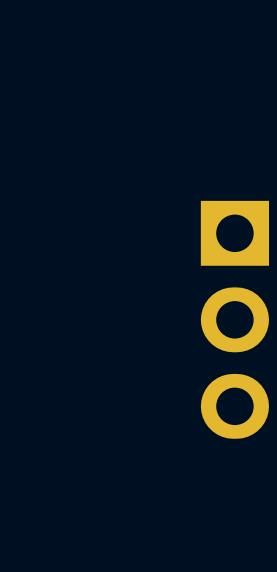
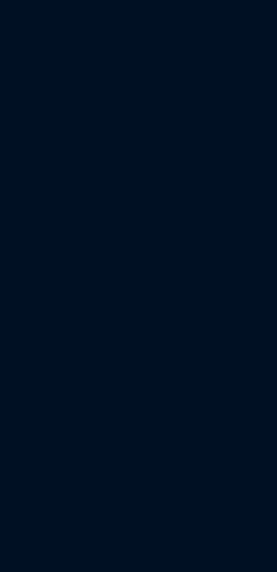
part: (234, 319) -> none

